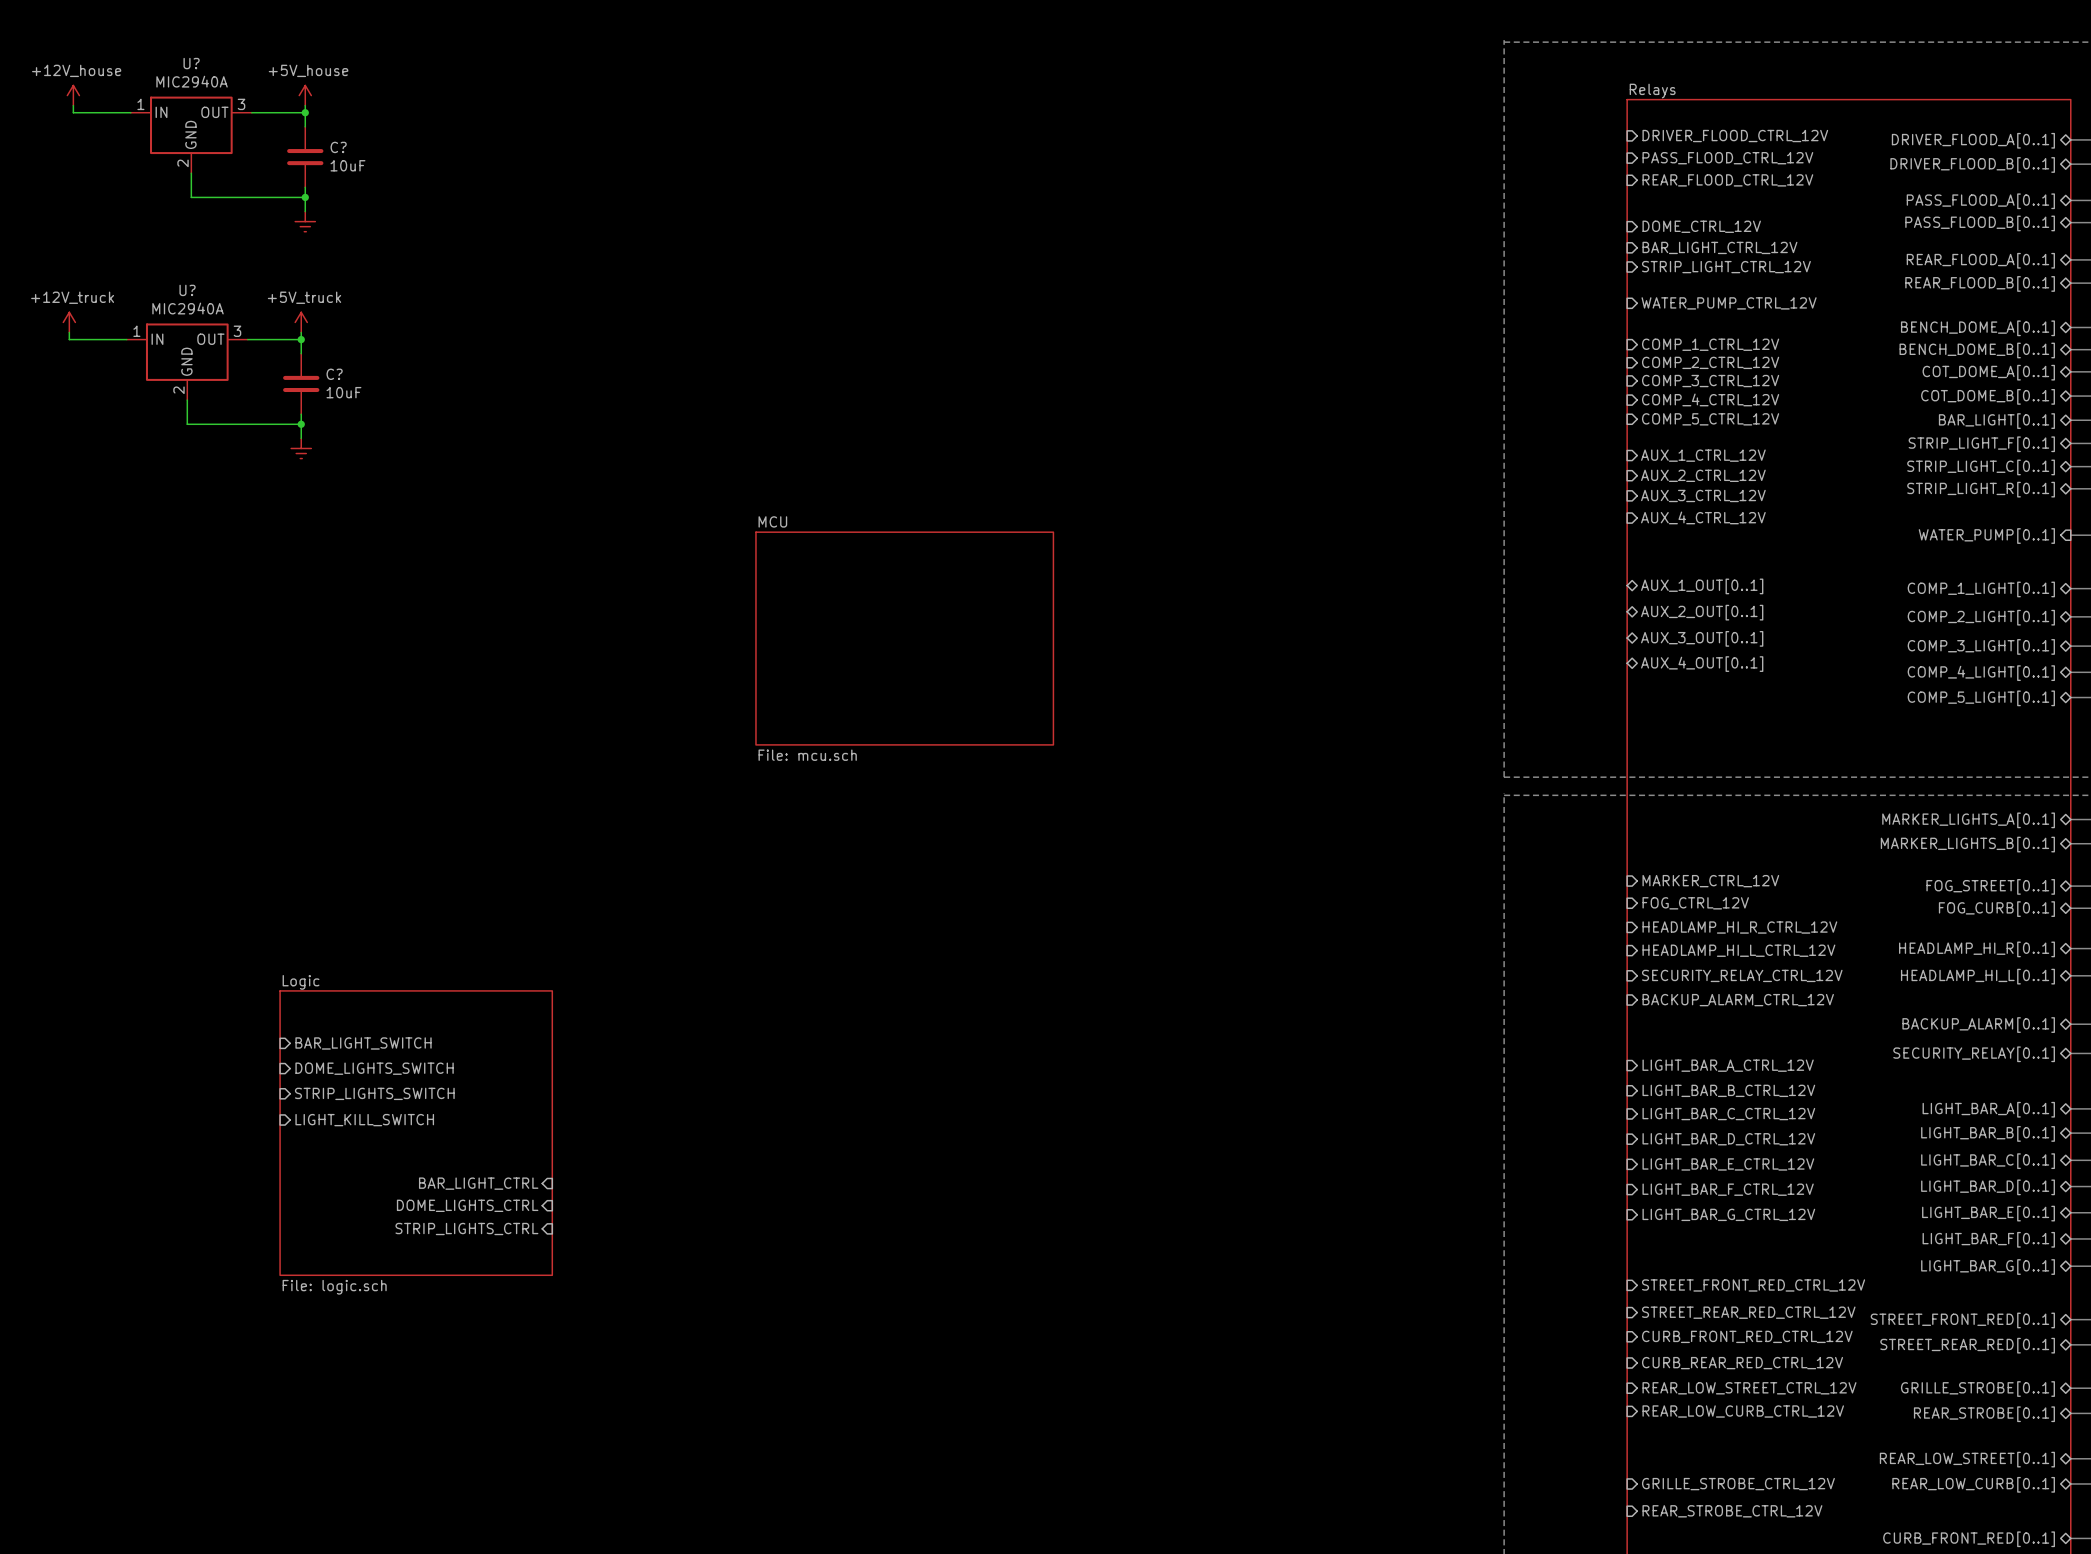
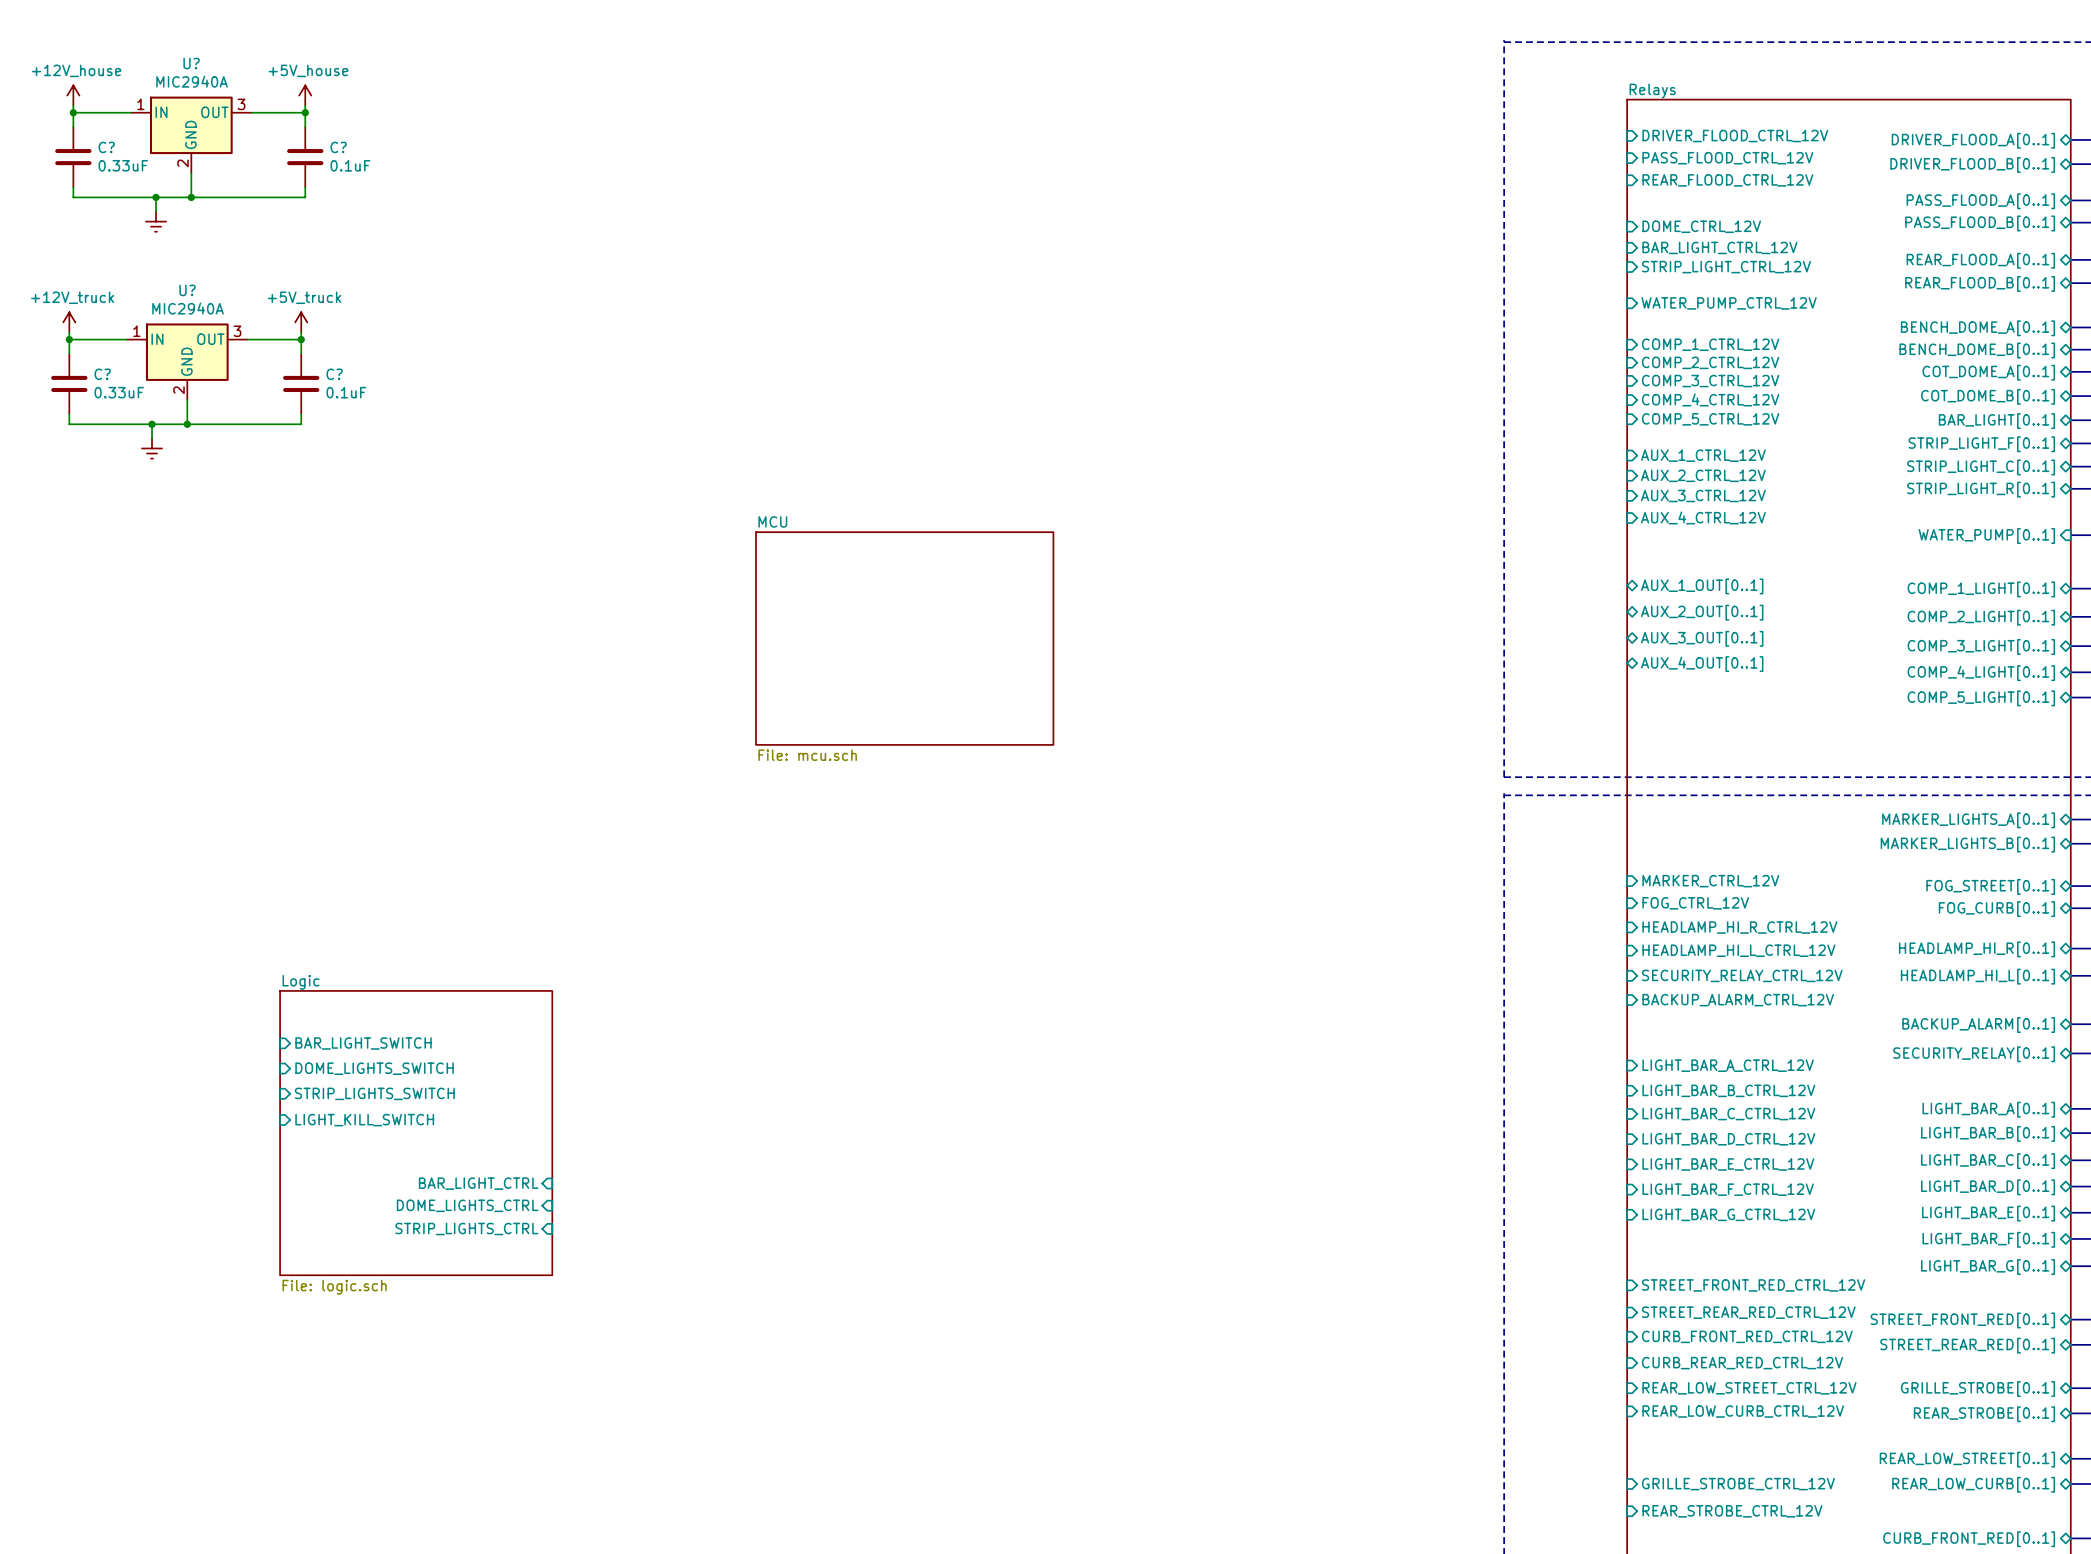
wire: none -> (73, 112) (73, 126)
junction: none -> (73, 112)
C?: none -> 0.33uF (73, 157)
C? value: 10uF (347, 165) -> 0.1uF (350, 165)
wire: none -> (73, 187) (73, 197) (191, 197)
junction: none -> (156, 197)
junction: none -> (191, 197)
wire: (305, 197) (305, 211) -> (156, 197) (156, 211)
junction: (305, 197) -> none
power symbol: none -> (156, 221)
power symbol: (305, 221) -> none
wire: none -> (69, 339) (69, 353)
junction: none -> (69, 339)
C?: none -> 0.33uF (69, 383)
C? value: 10uF (343, 392) -> 0.1uF (346, 392)
wire: none -> (69, 414) (69, 424) (187, 424)
junction: none -> (152, 424)
junction: none -> (187, 424)
wire: (301, 424) (301, 438) -> (152, 424) (152, 438)
junction: (301, 424) -> none
power symbol: none -> (152, 448)
power symbol: (301, 448) -> none

